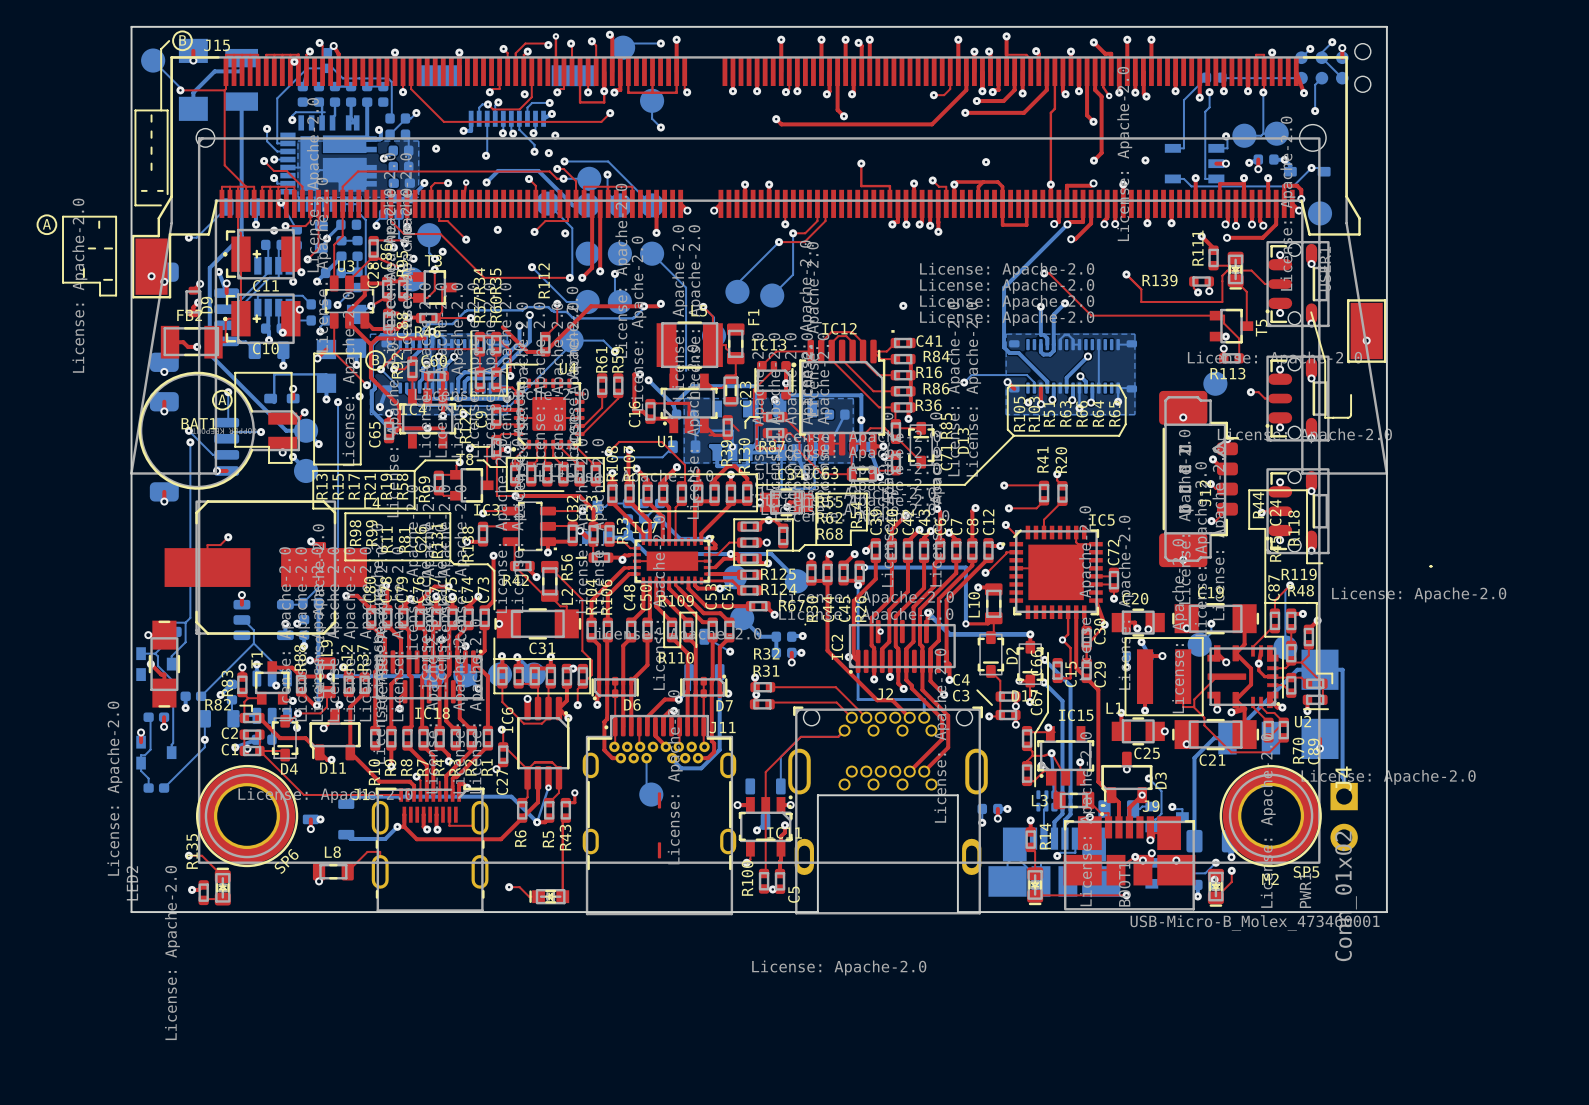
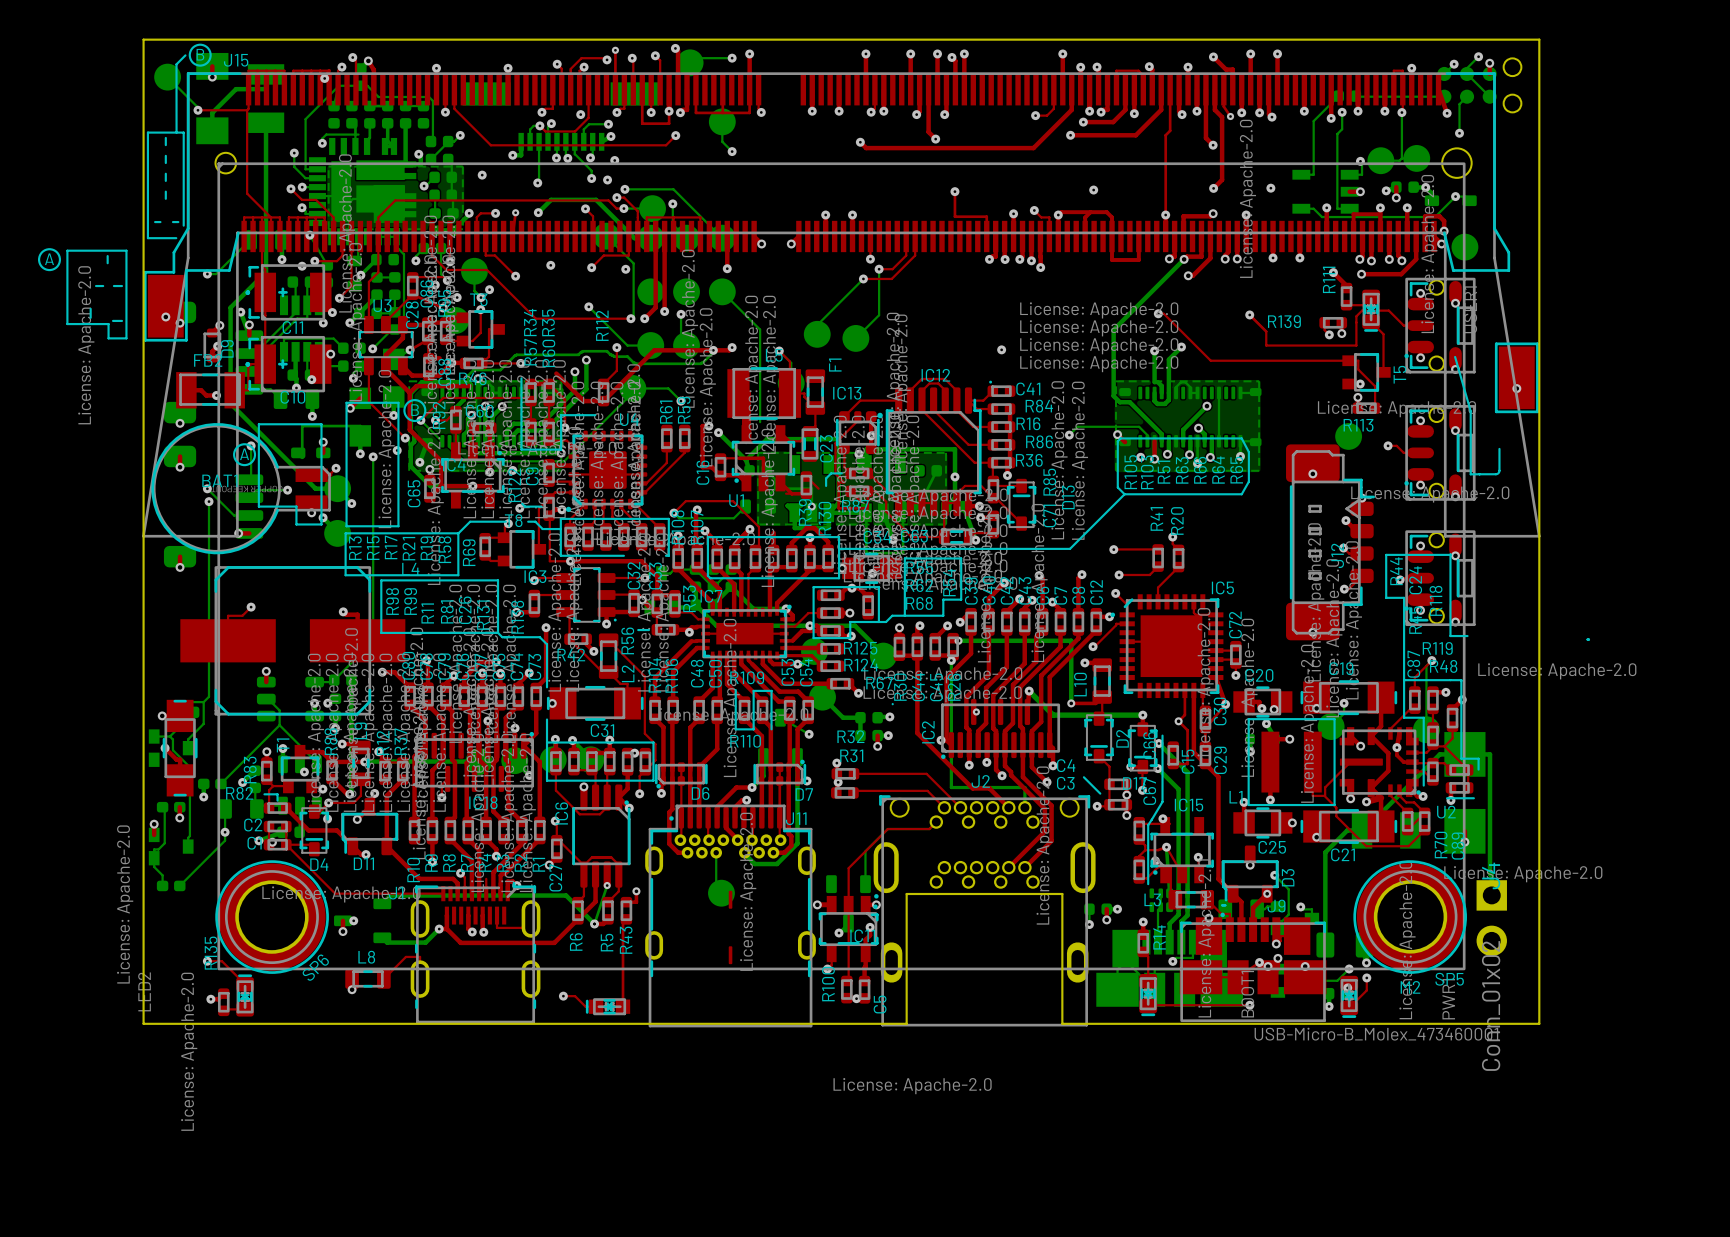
top track: (1006, 36) (1006, 54) -> none
via: (1006, 36) -> none

